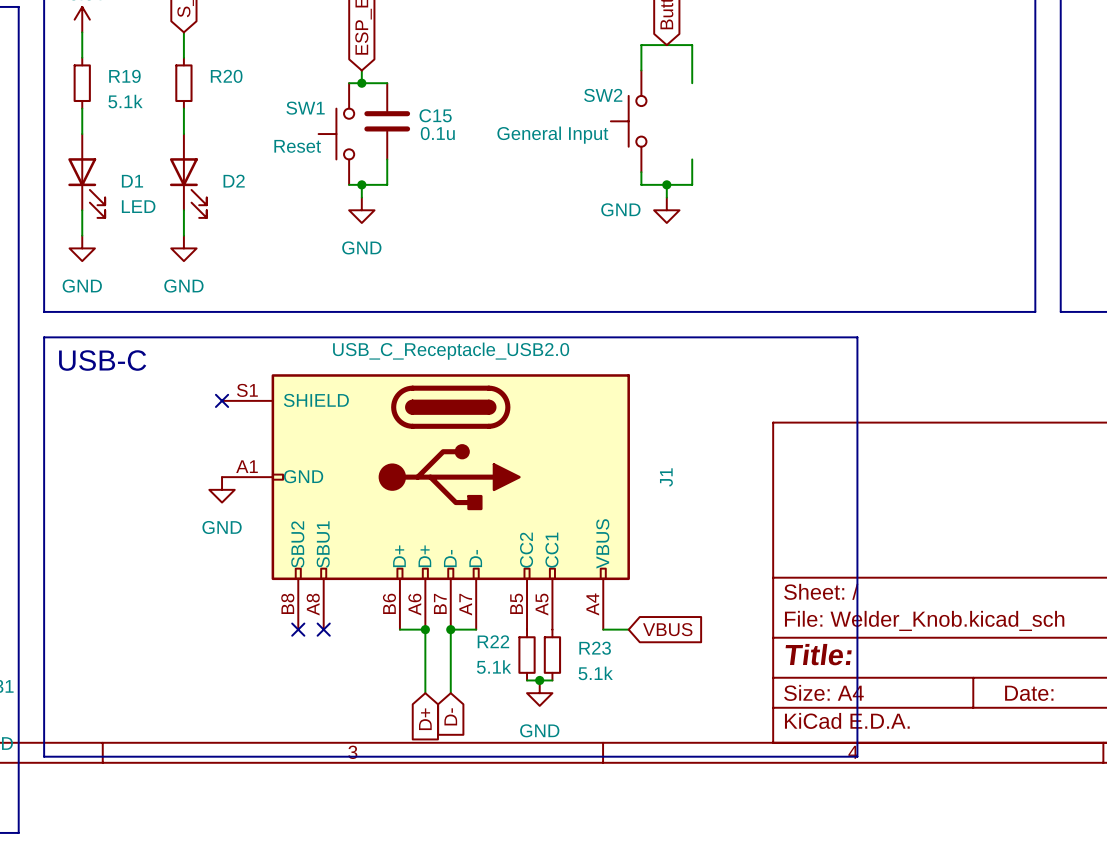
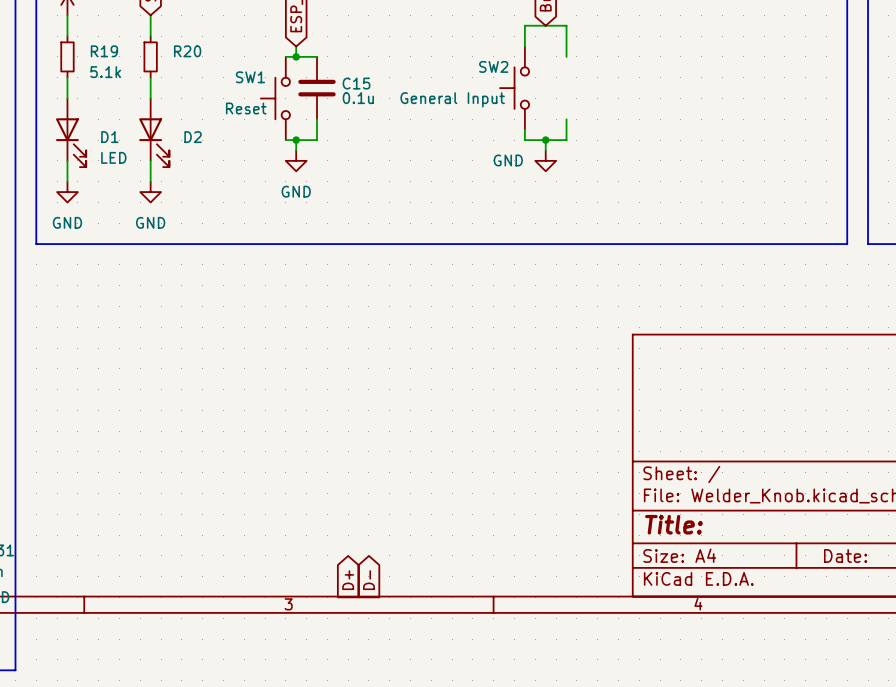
line: (44, 337) (44, 756) (857, 756) (857, 337) (44, 337) -> none
text: USB-C (102, 360) -> none
no-connect mark: (222, 400) -> none
power symbol: GND (222, 489) -> none
J1: USB_C_Receptacle_USB2.0 (425, 501) -> none
no-connect mark: (298, 629) -> none
no-connect mark: (323, 629) -> none
wire: (399, 629) (425, 629) (425, 693) -> none
junction: (425, 629) -> none
junction: (450, 629) -> none
wire: (476, 629) (450, 629) (450, 693) -> none
wire: (603, 629) (628, 629) -> none
global label: VBUS (667, 629) -> none
R22: 5.1k (527, 655) -> none
R23: 5.1k (552, 655) -> none
wire: (527, 680) (552, 680) -> none
junction: (539, 680) -> none
power symbol: GND (539, 693) -> none

